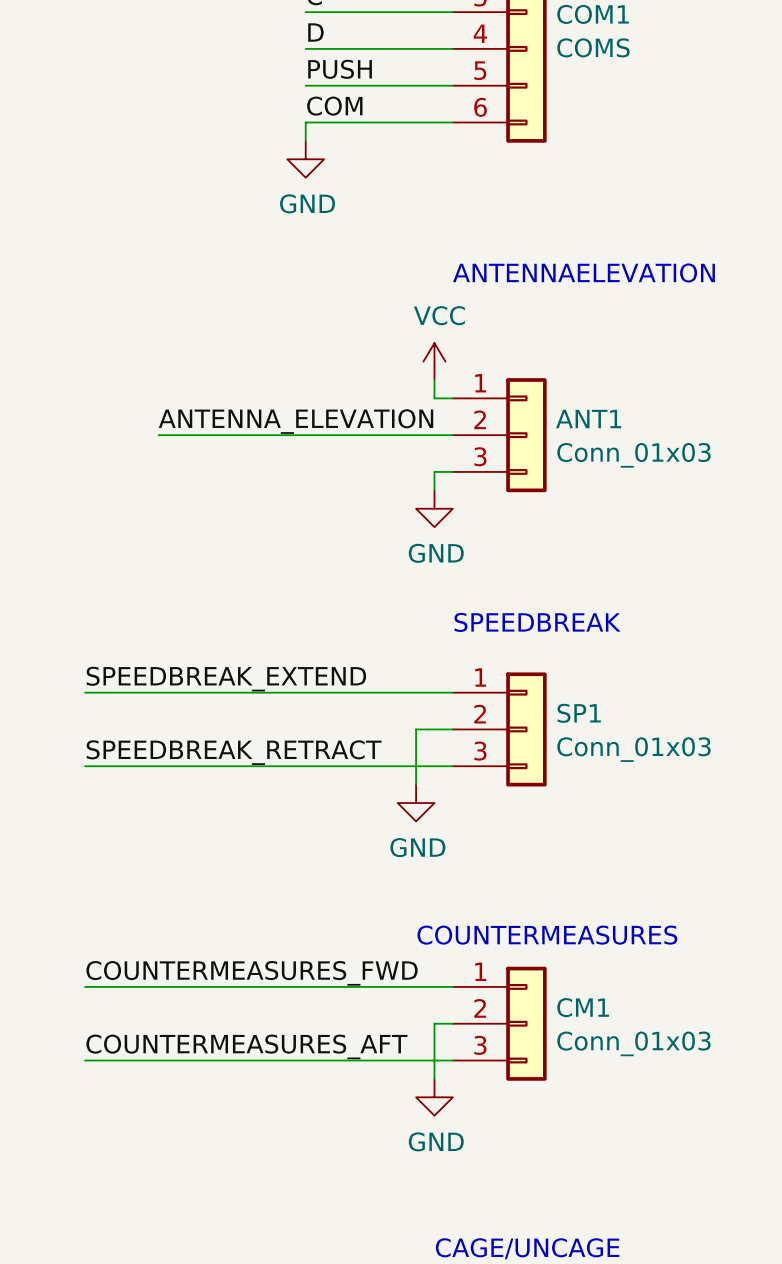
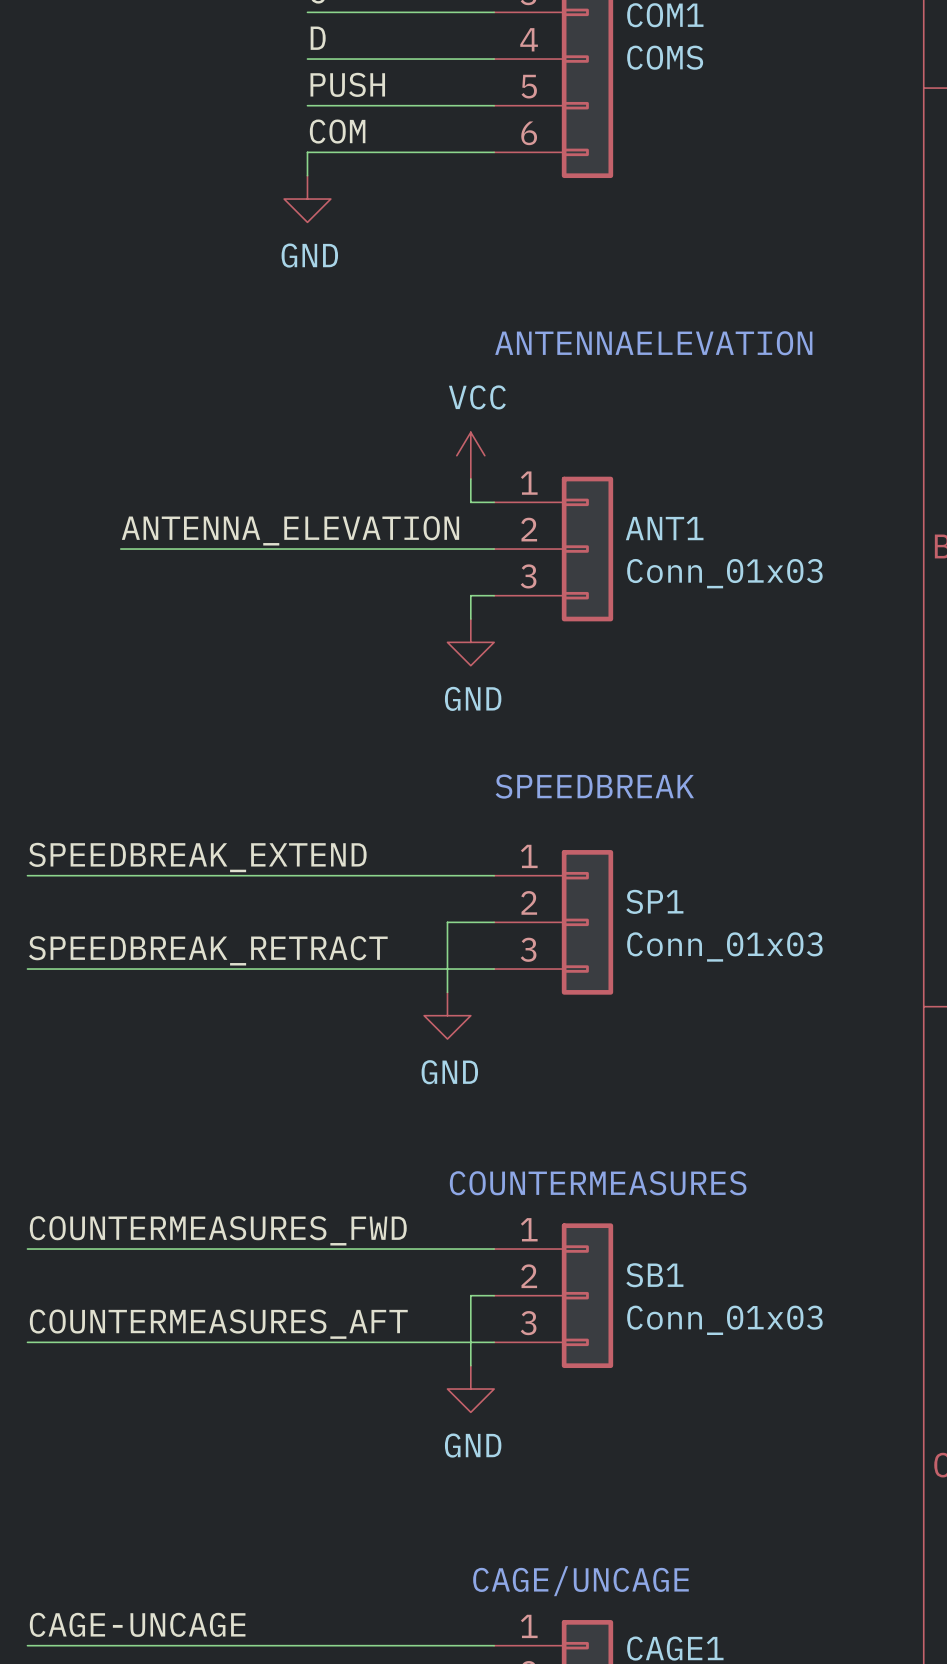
CM1 name: CM1 (583, 1007) -> SB1 (654, 1275)

